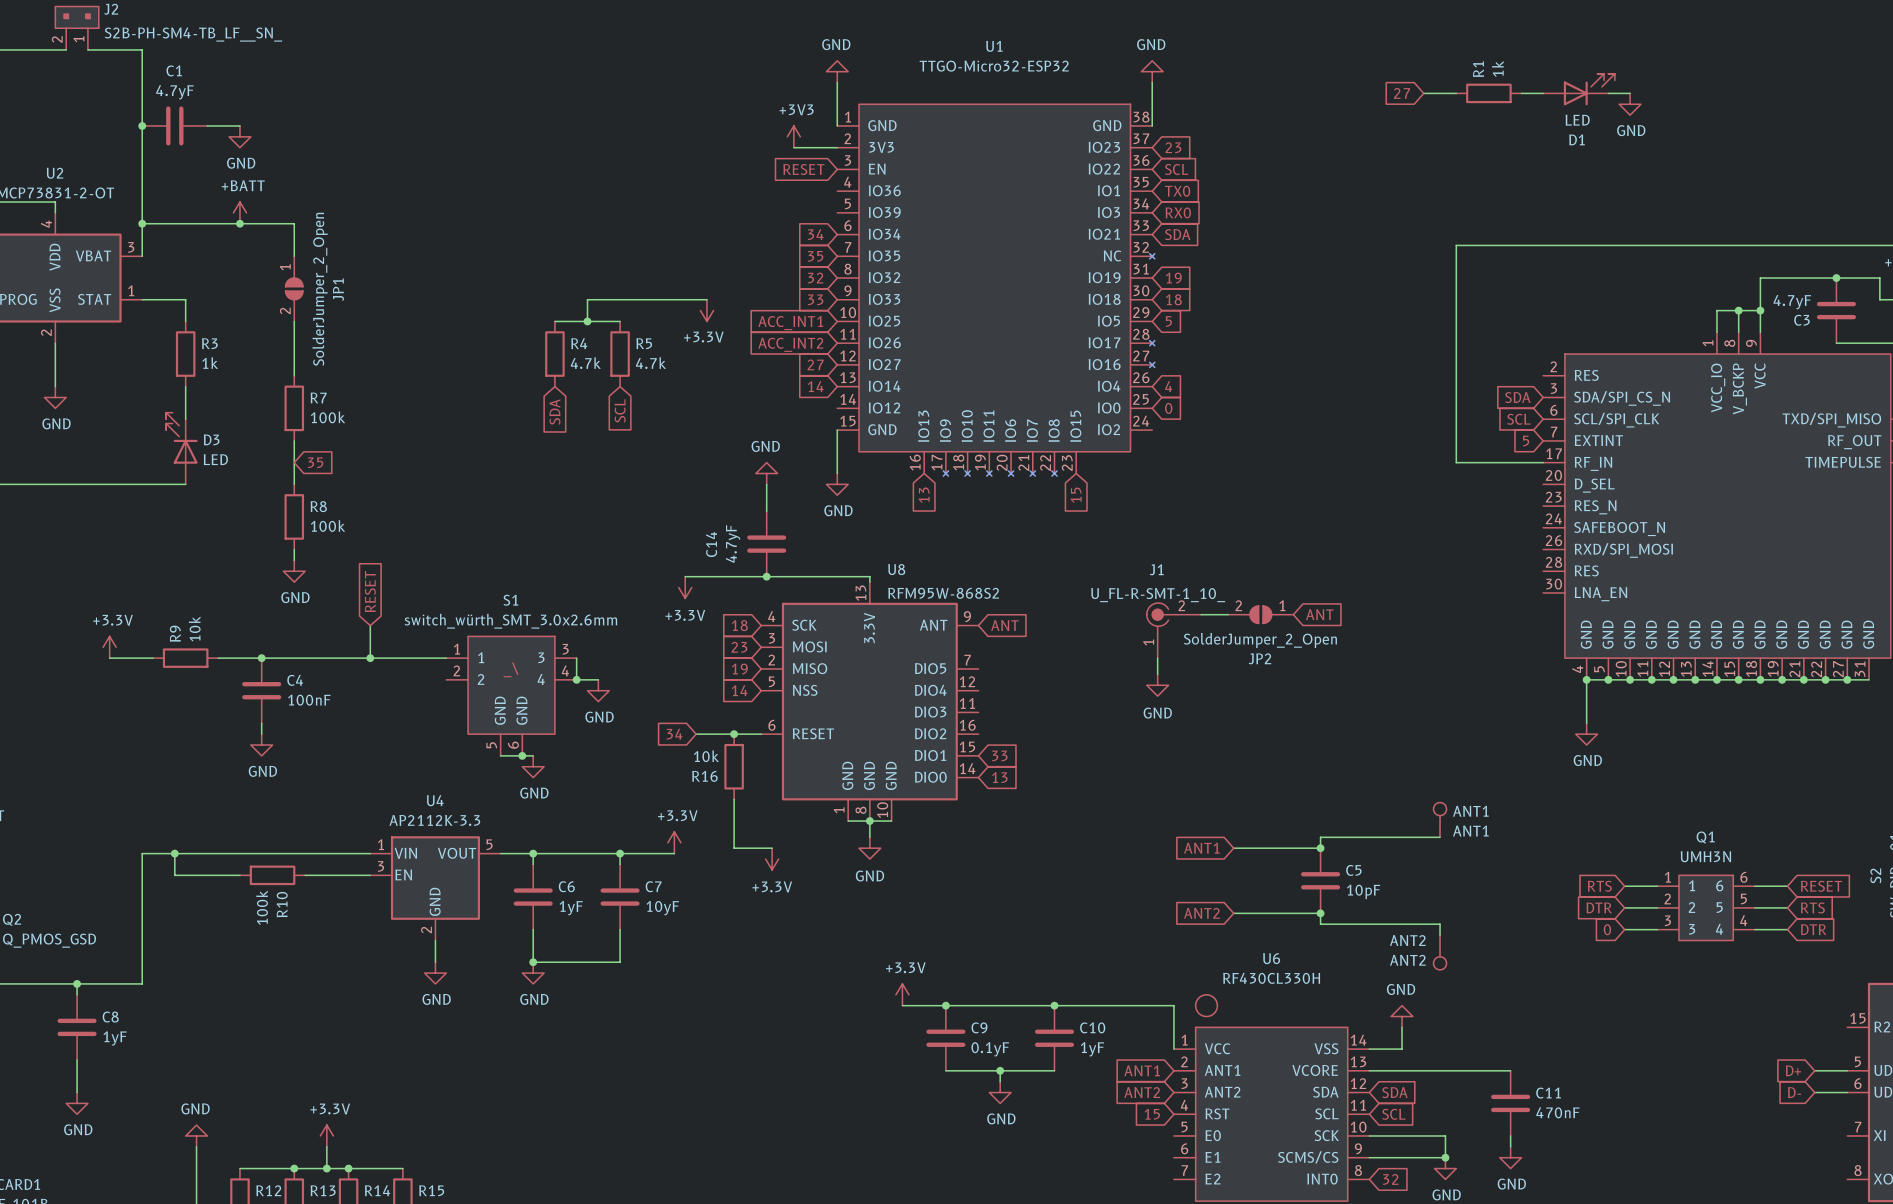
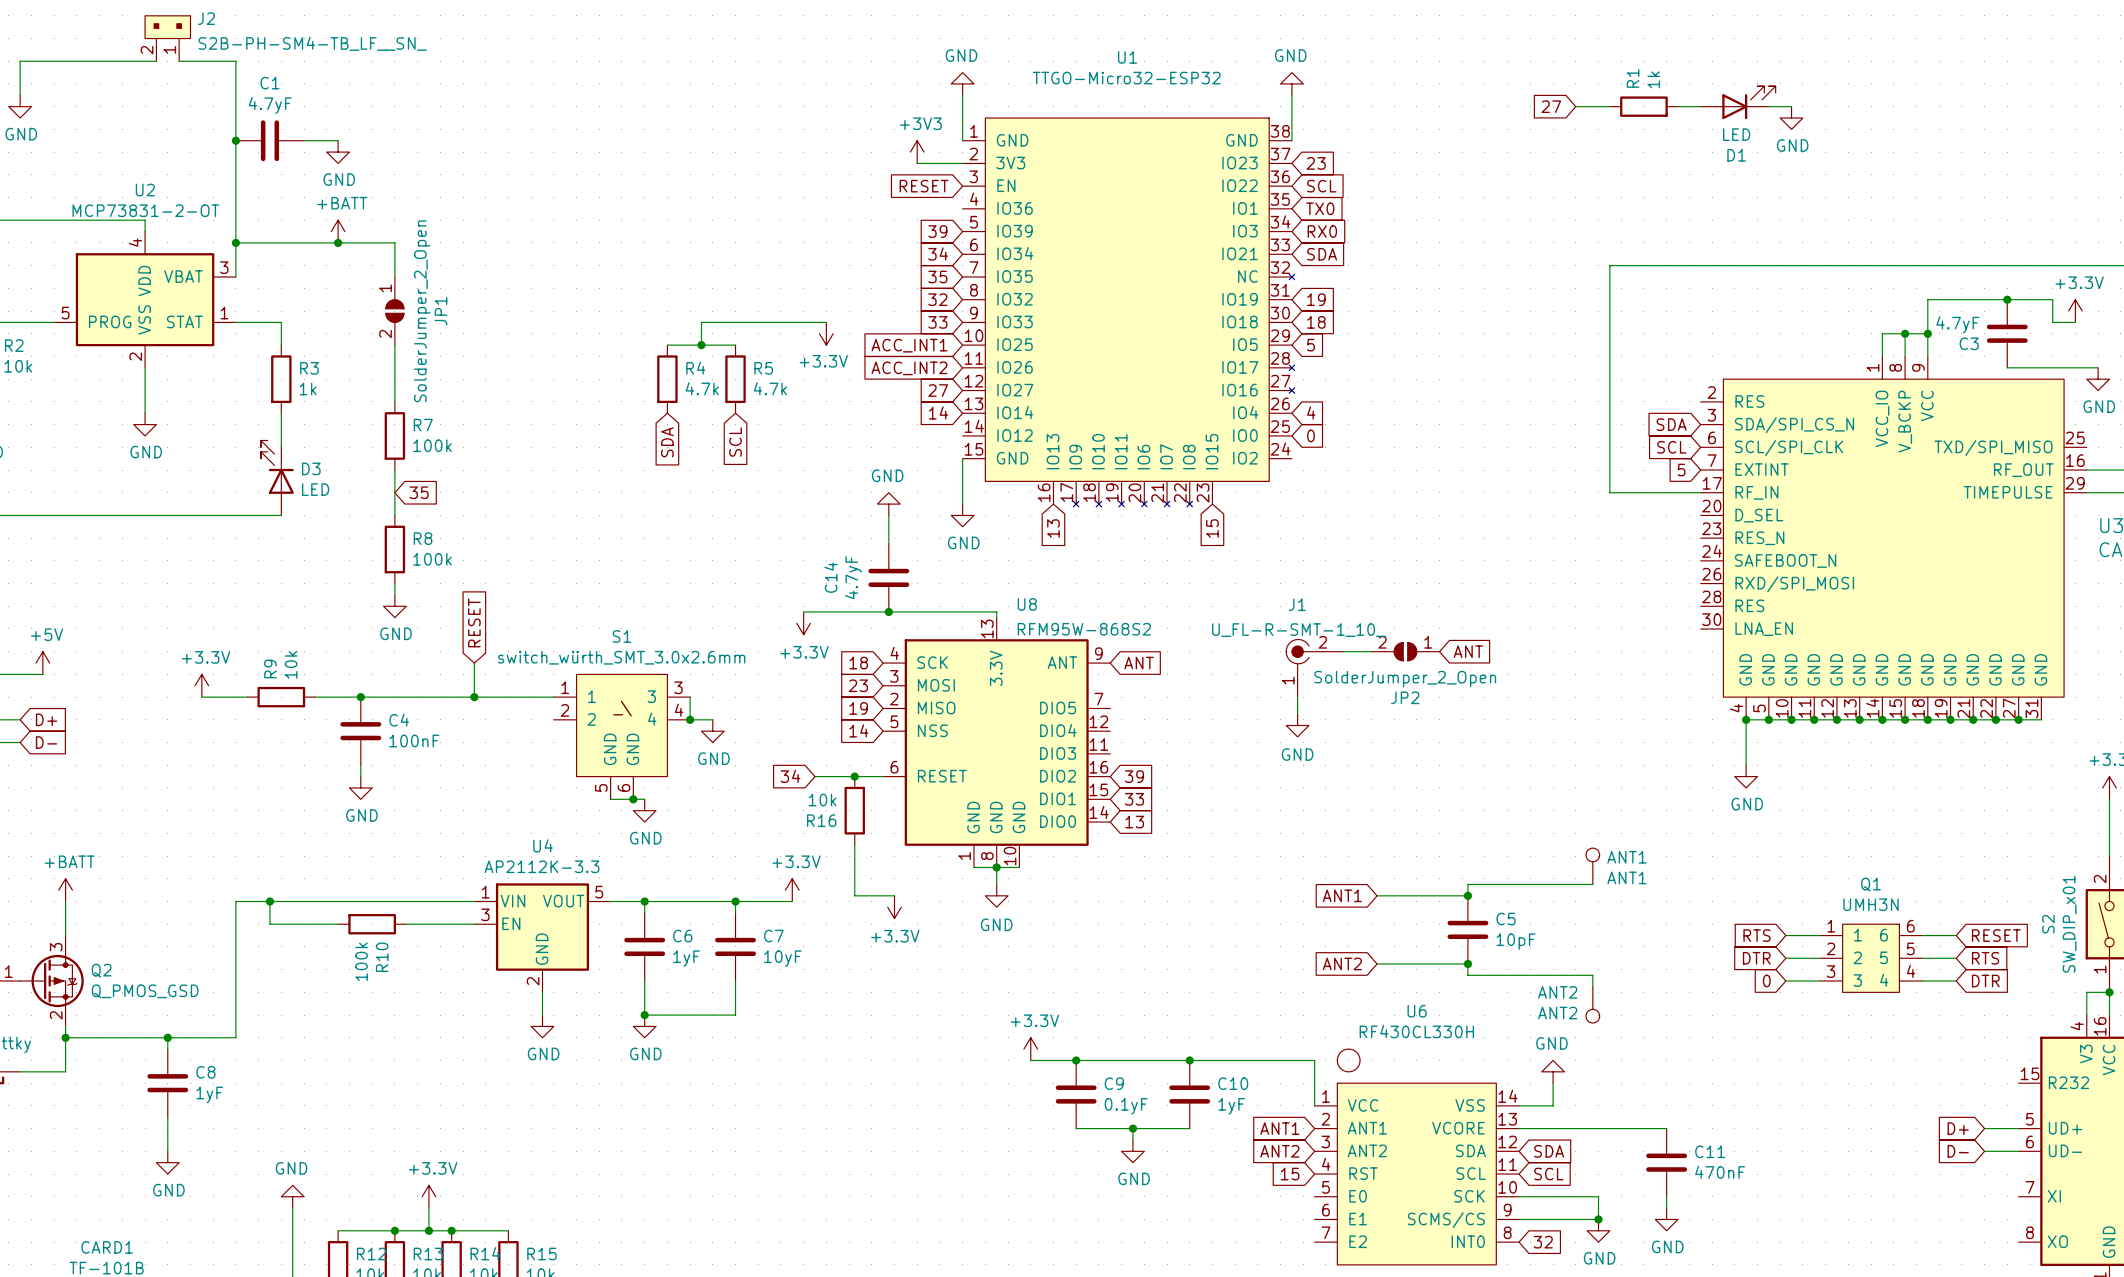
global label: none -> 39 (937, 231)
global label: none -> 39 (1134, 776)

